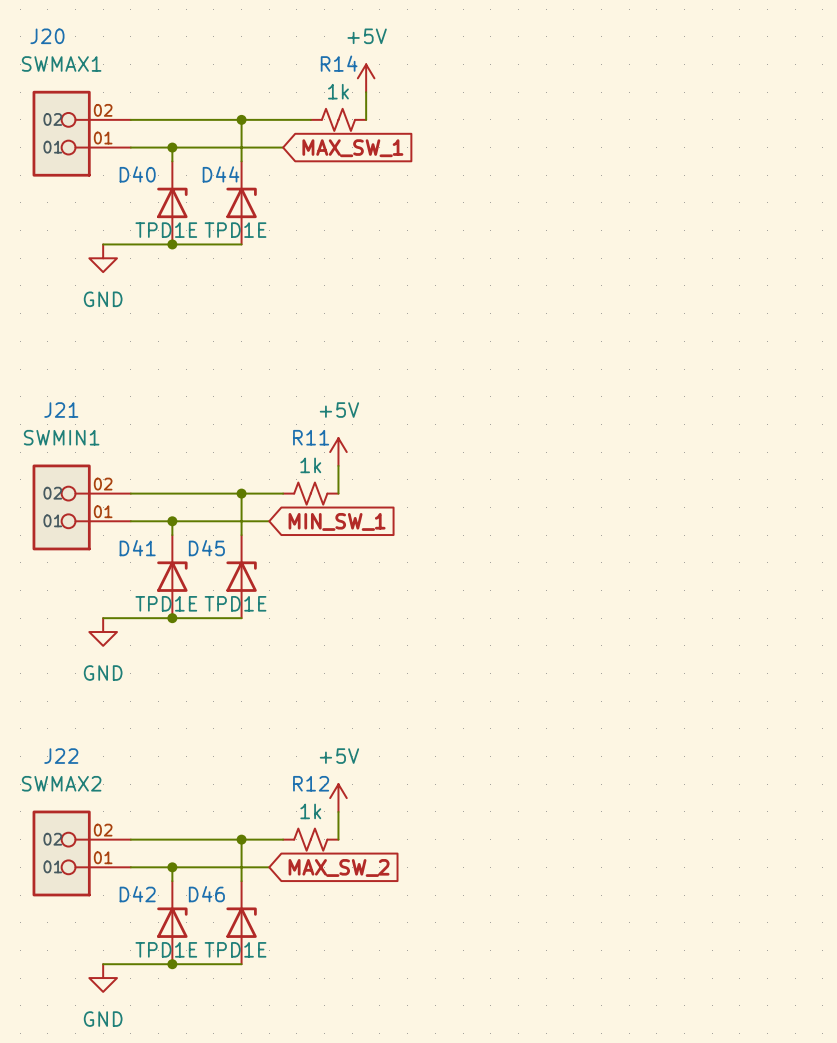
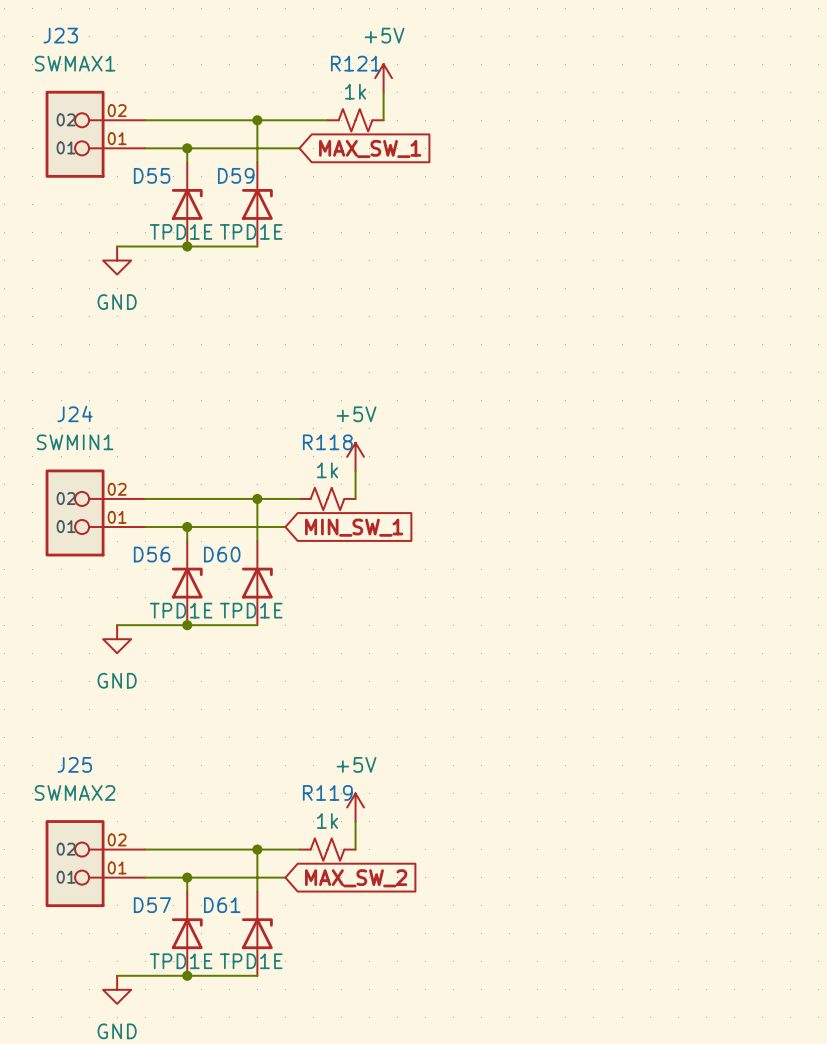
J20 name: J20 (47, 36) -> J23 (60, 35)
R14 name: R14 (339, 63) -> R121 (355, 63)
D40 name: D40 (137, 174) -> D55 (152, 175)
D44 name: D44 (221, 174) -> D59 (236, 175)
J21 name: J21 (61, 410) -> J24 (75, 413)
R11 name: R11 (311, 437) -> R118 (327, 442)
D41 name: D41 (137, 548) -> D56 (152, 554)
D45 name: D45 (206, 548) -> D60 (222, 554)
J22 name: J22 (61, 756) -> J25 (74, 764)
R12 name: R12 (311, 783) -> R119 (327, 792)
D42 name: D42 (137, 894) -> D57 (152, 905)
D46 name: D46 (206, 894) -> D61 (222, 905)

